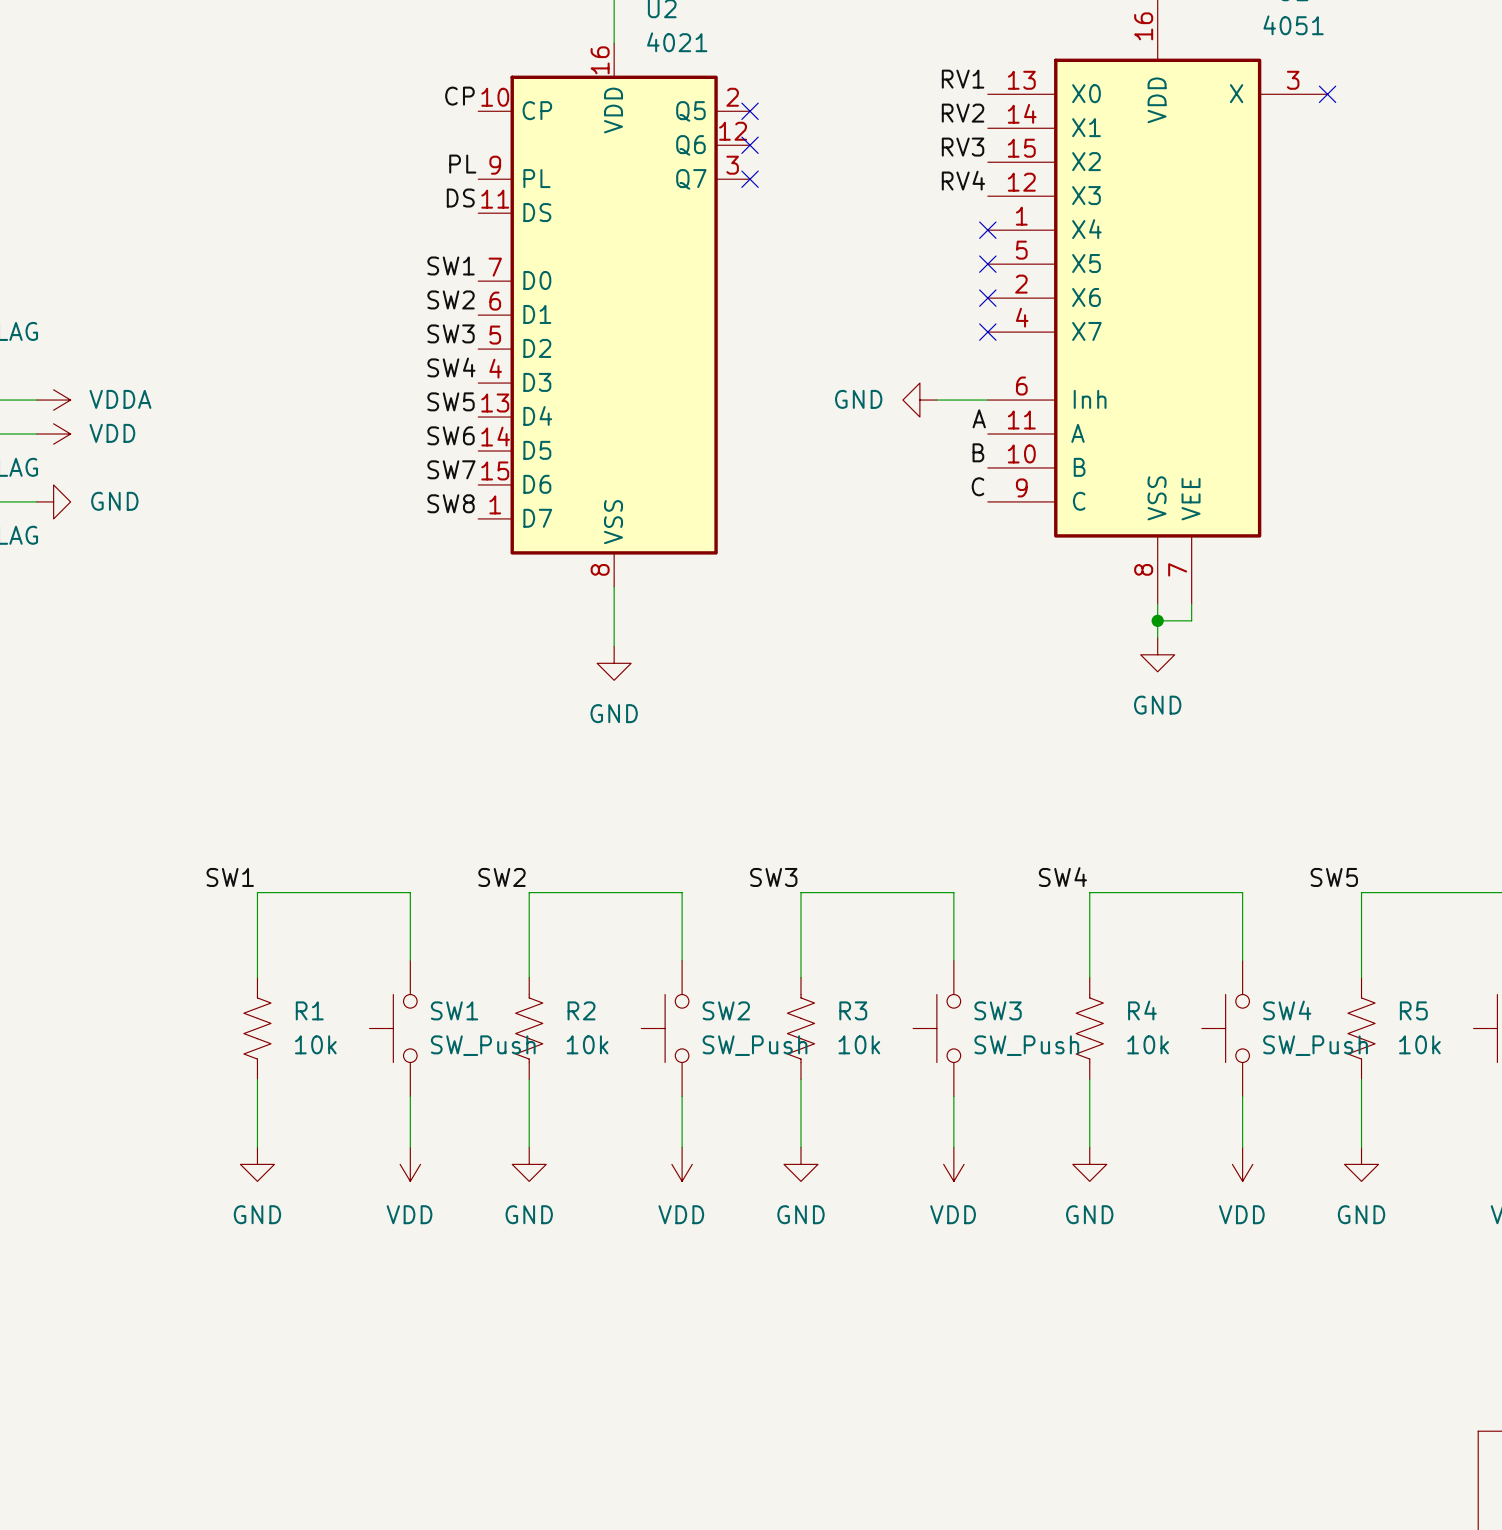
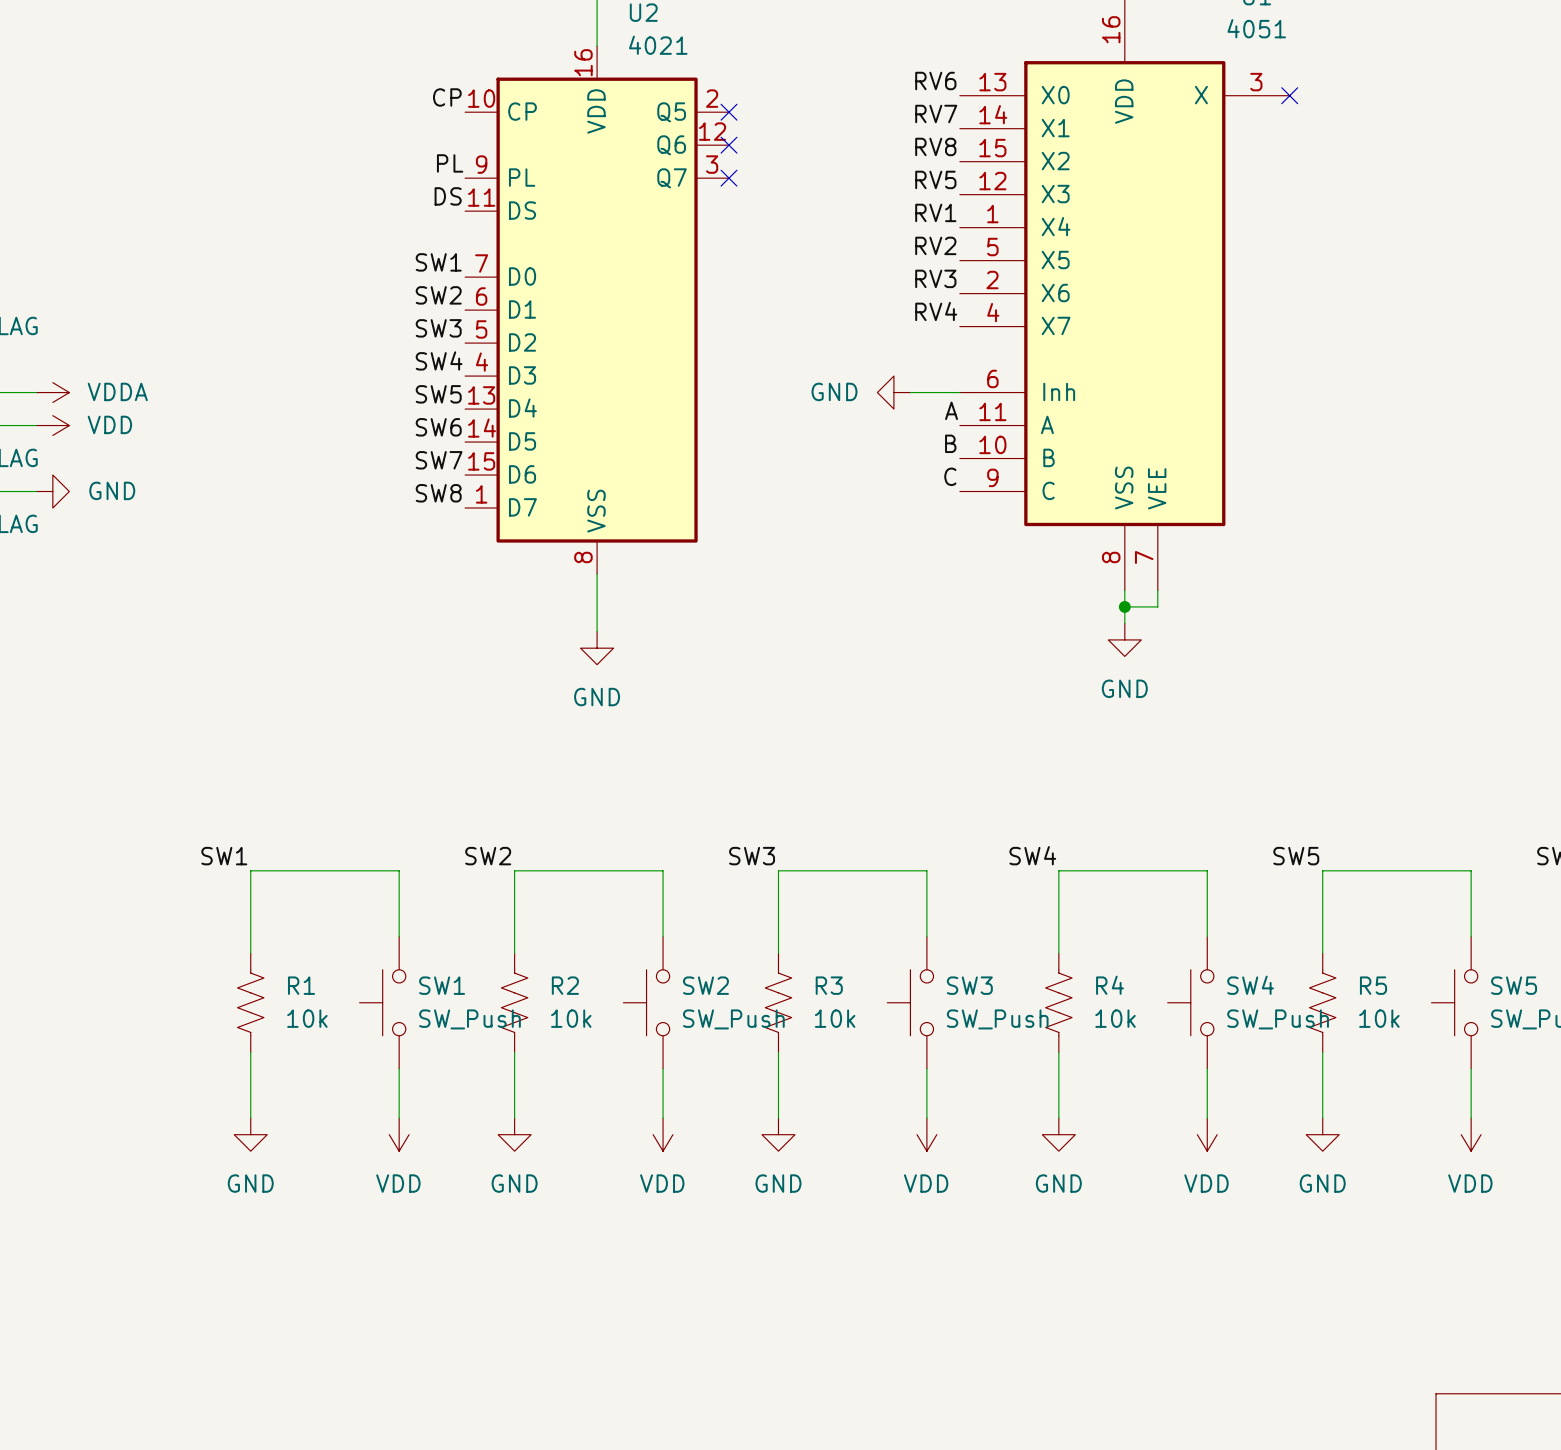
label: RV1 (963, 79) -> RV6 (935, 80)
label: RV2 (963, 113) -> RV7 (936, 113)
label: RV3 (963, 147) -> RV8 (935, 146)
label: RV4 (963, 180) -> RV5 (935, 179)
label: none -> RV1 (935, 212)
no-connect mark: (987, 230) -> none
label: none -> RV2 (935, 245)
no-connect mark: (987, 264) -> none
label: none -> RV3 (935, 278)
no-connect mark: (987, 298) -> none
label: none -> RV4 (936, 311)
no-connect mark: (987, 332) -> none

